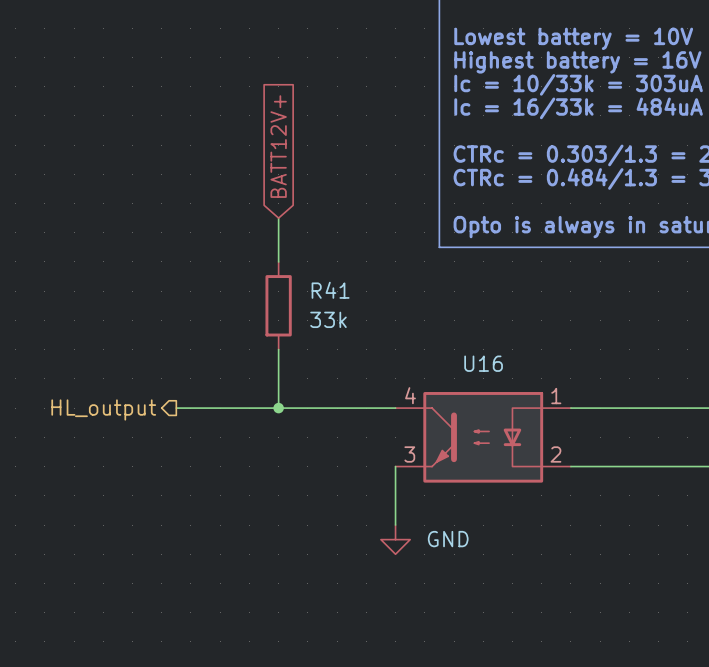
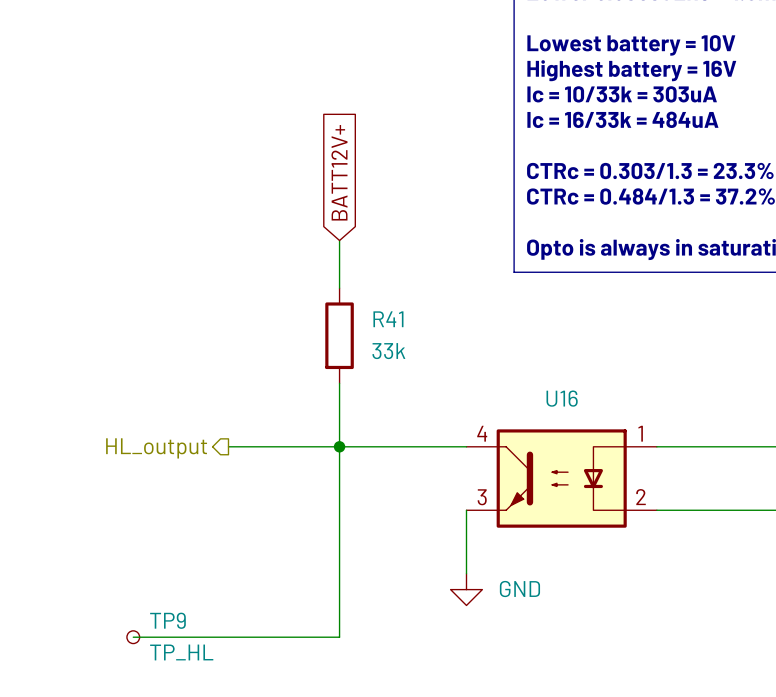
wire: none -> (339, 446) (339, 637) (133, 637)
TP9: none -> TP_HL (133, 637)

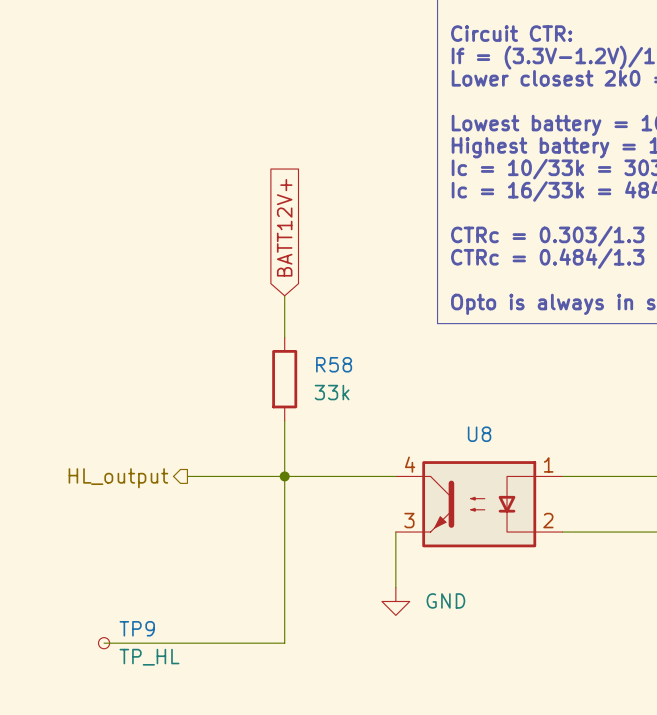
R41 name: R41 (388, 319) -> R58 (334, 364)
U16 name: U16 (562, 398) -> U8 (479, 434)

